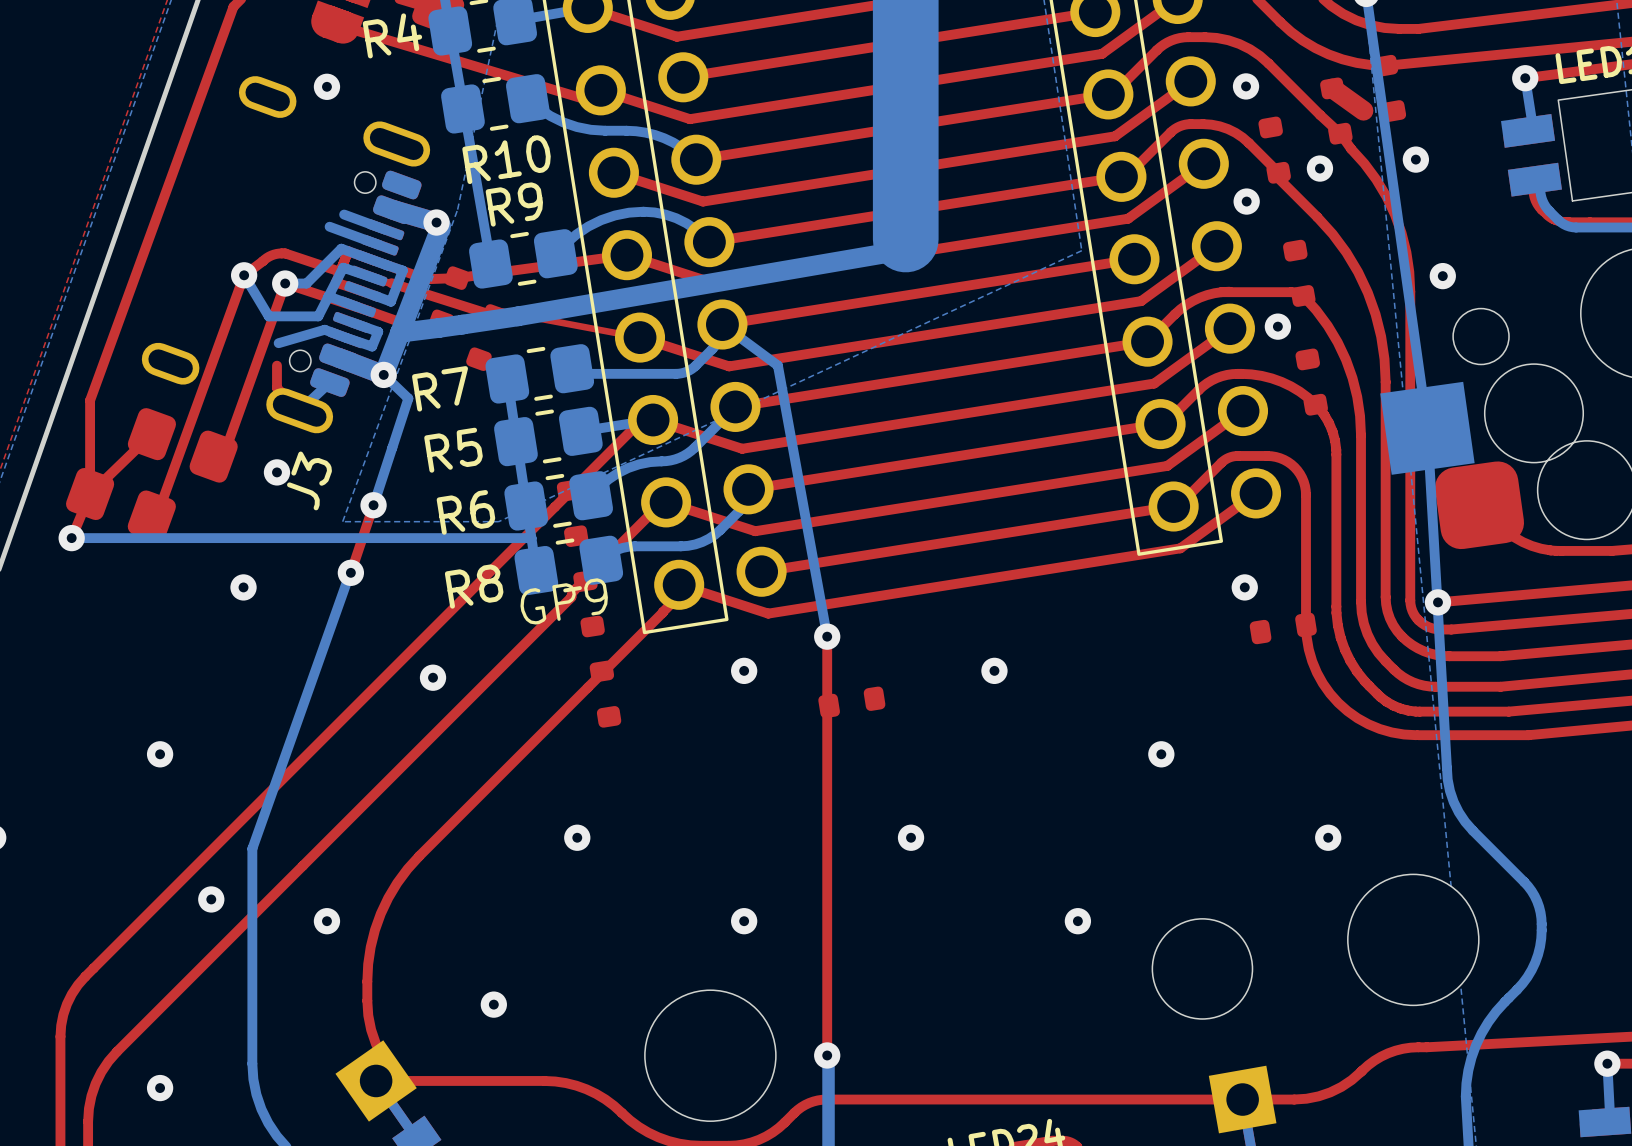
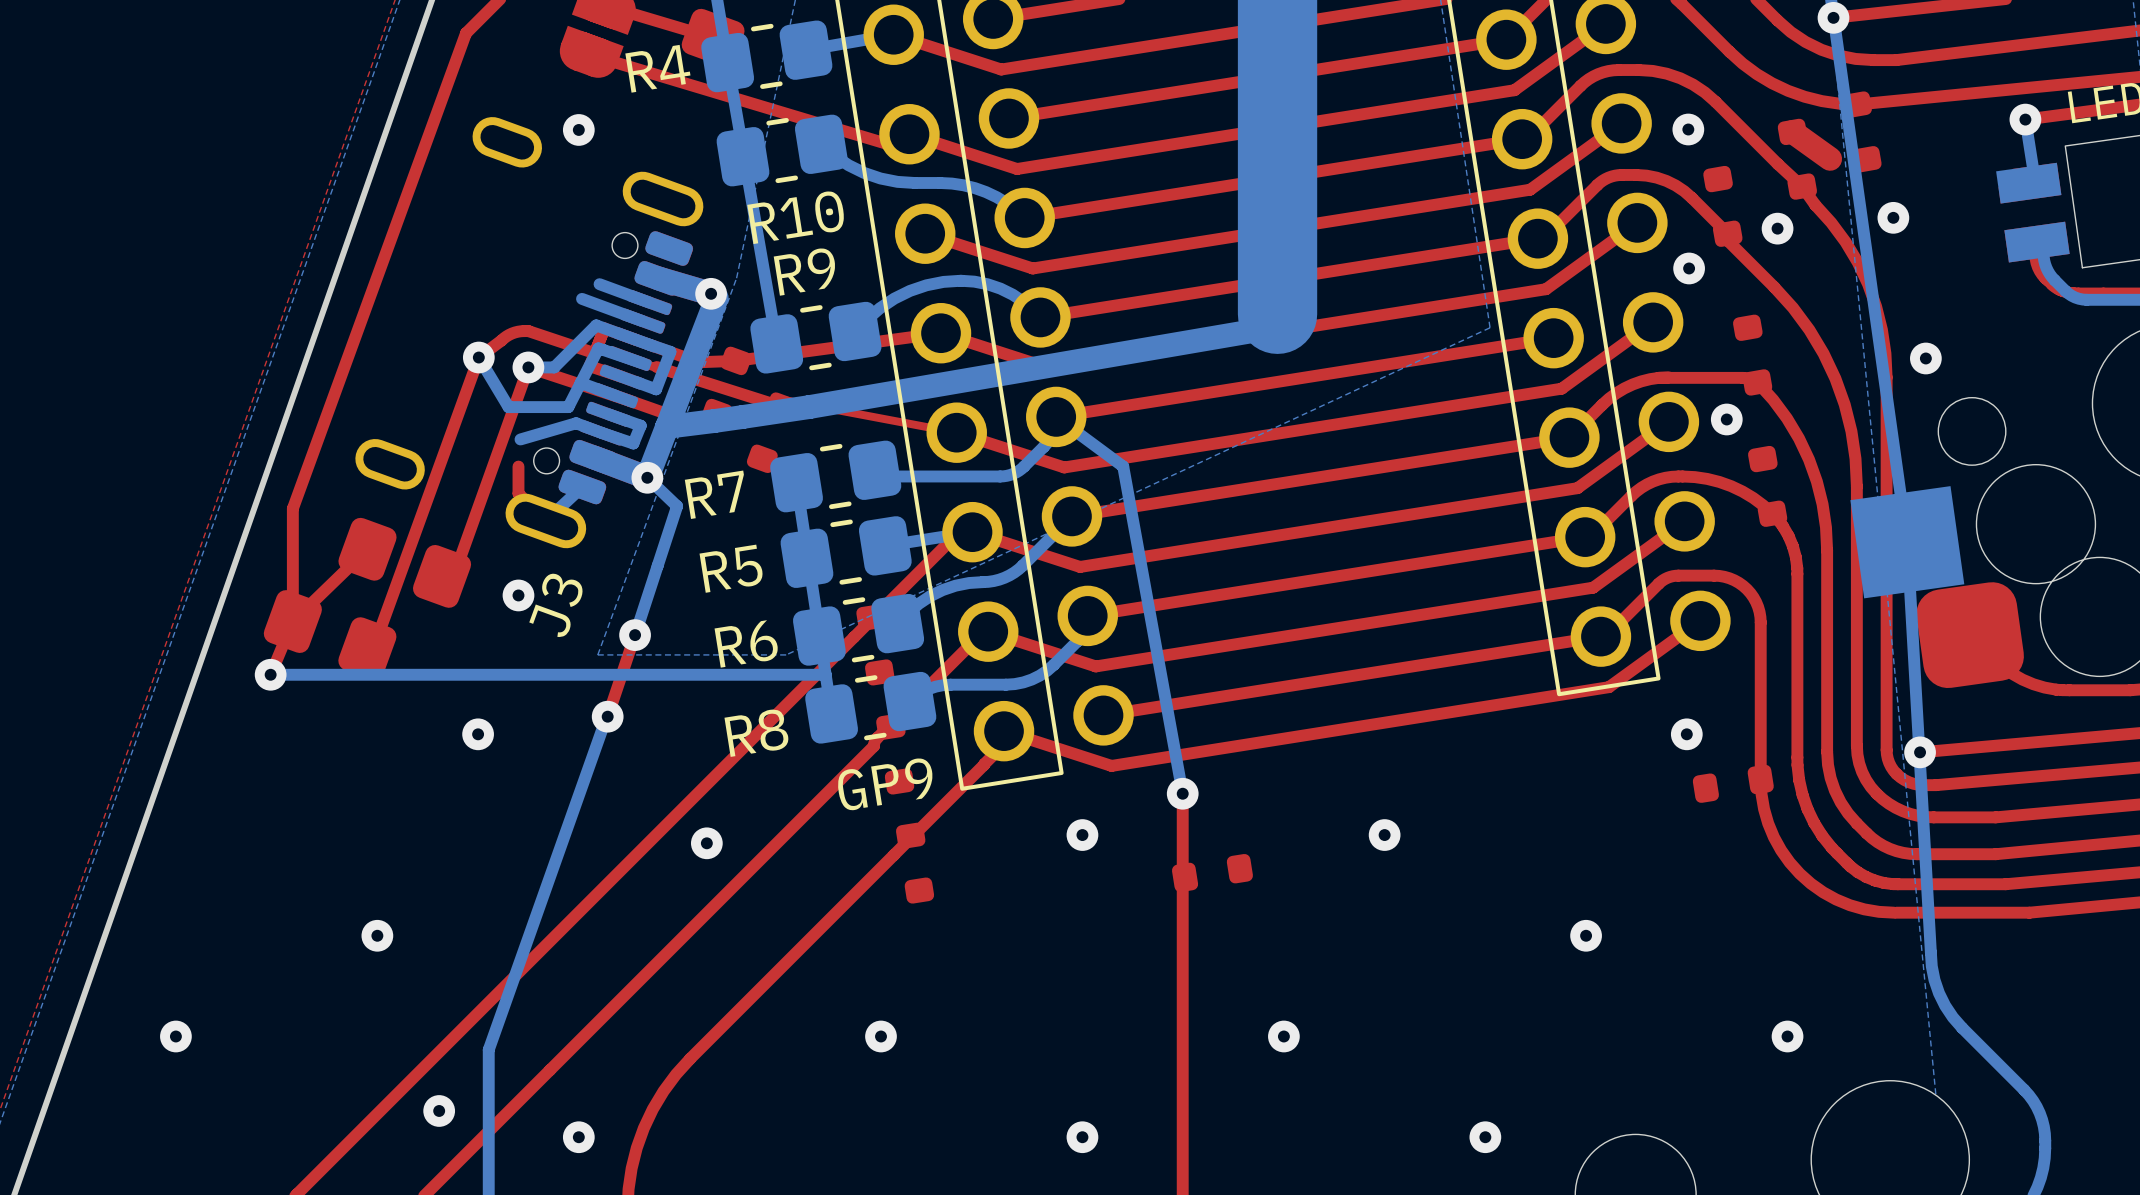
part text position: GP9 (564, 601) -> GP9 (884, 784)

